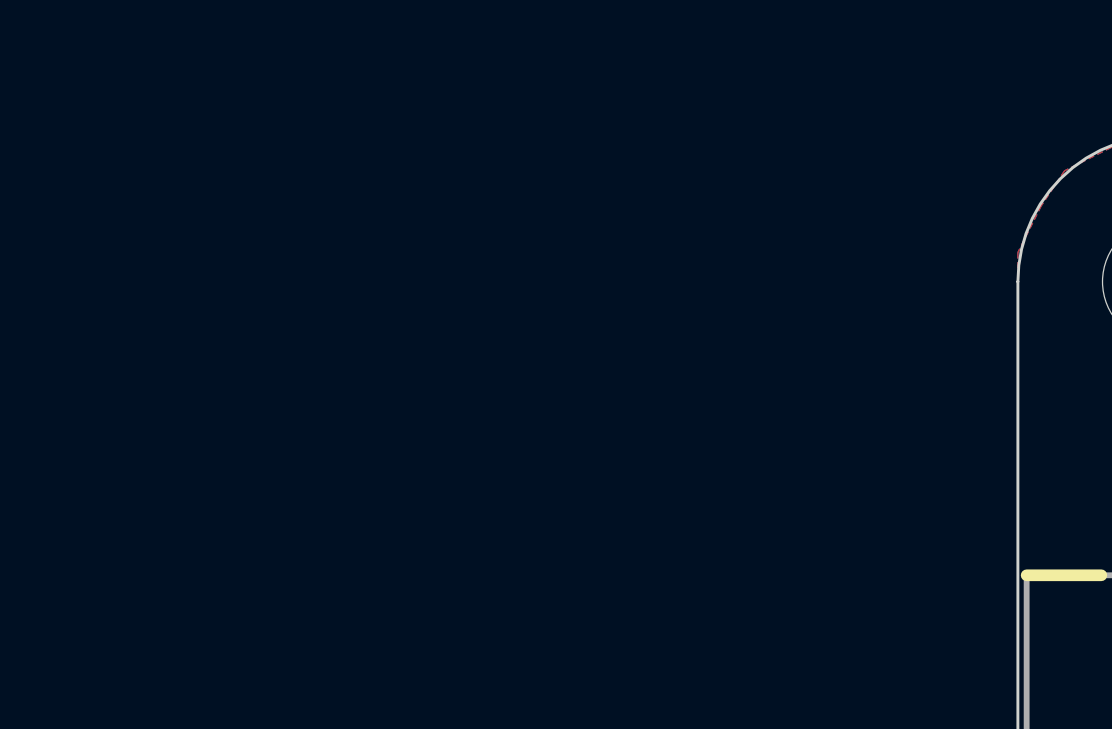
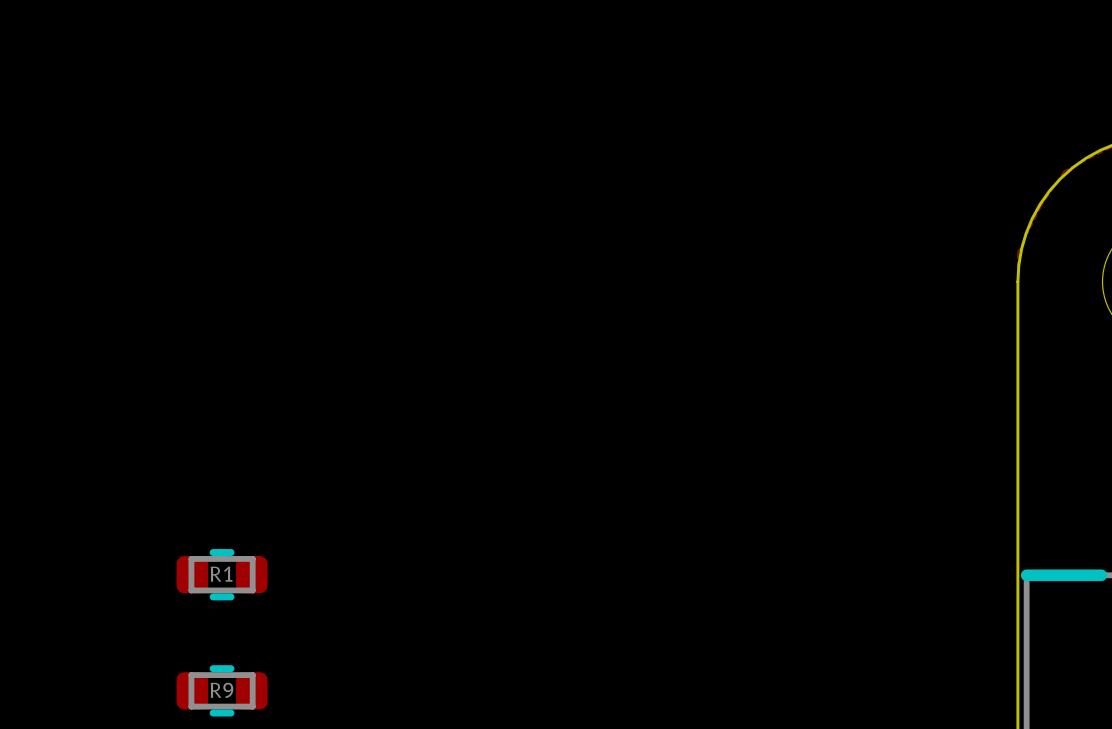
R1: none -> (222, 574)
R9: none -> (222, 690)

